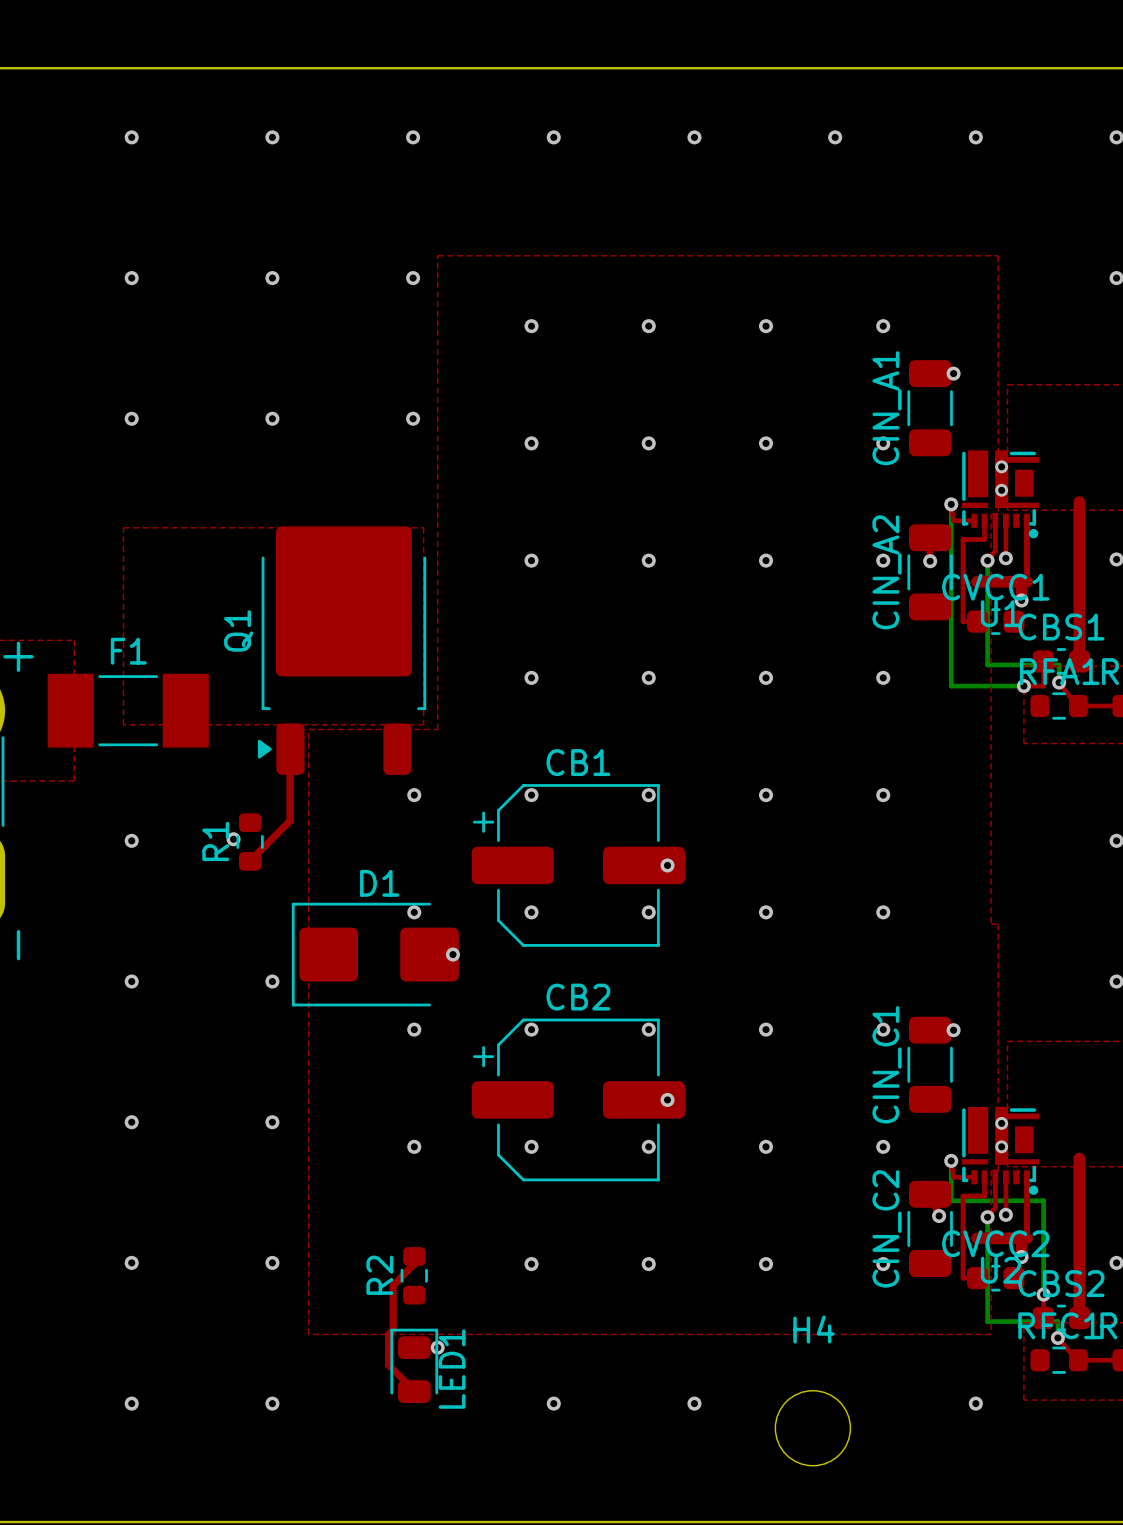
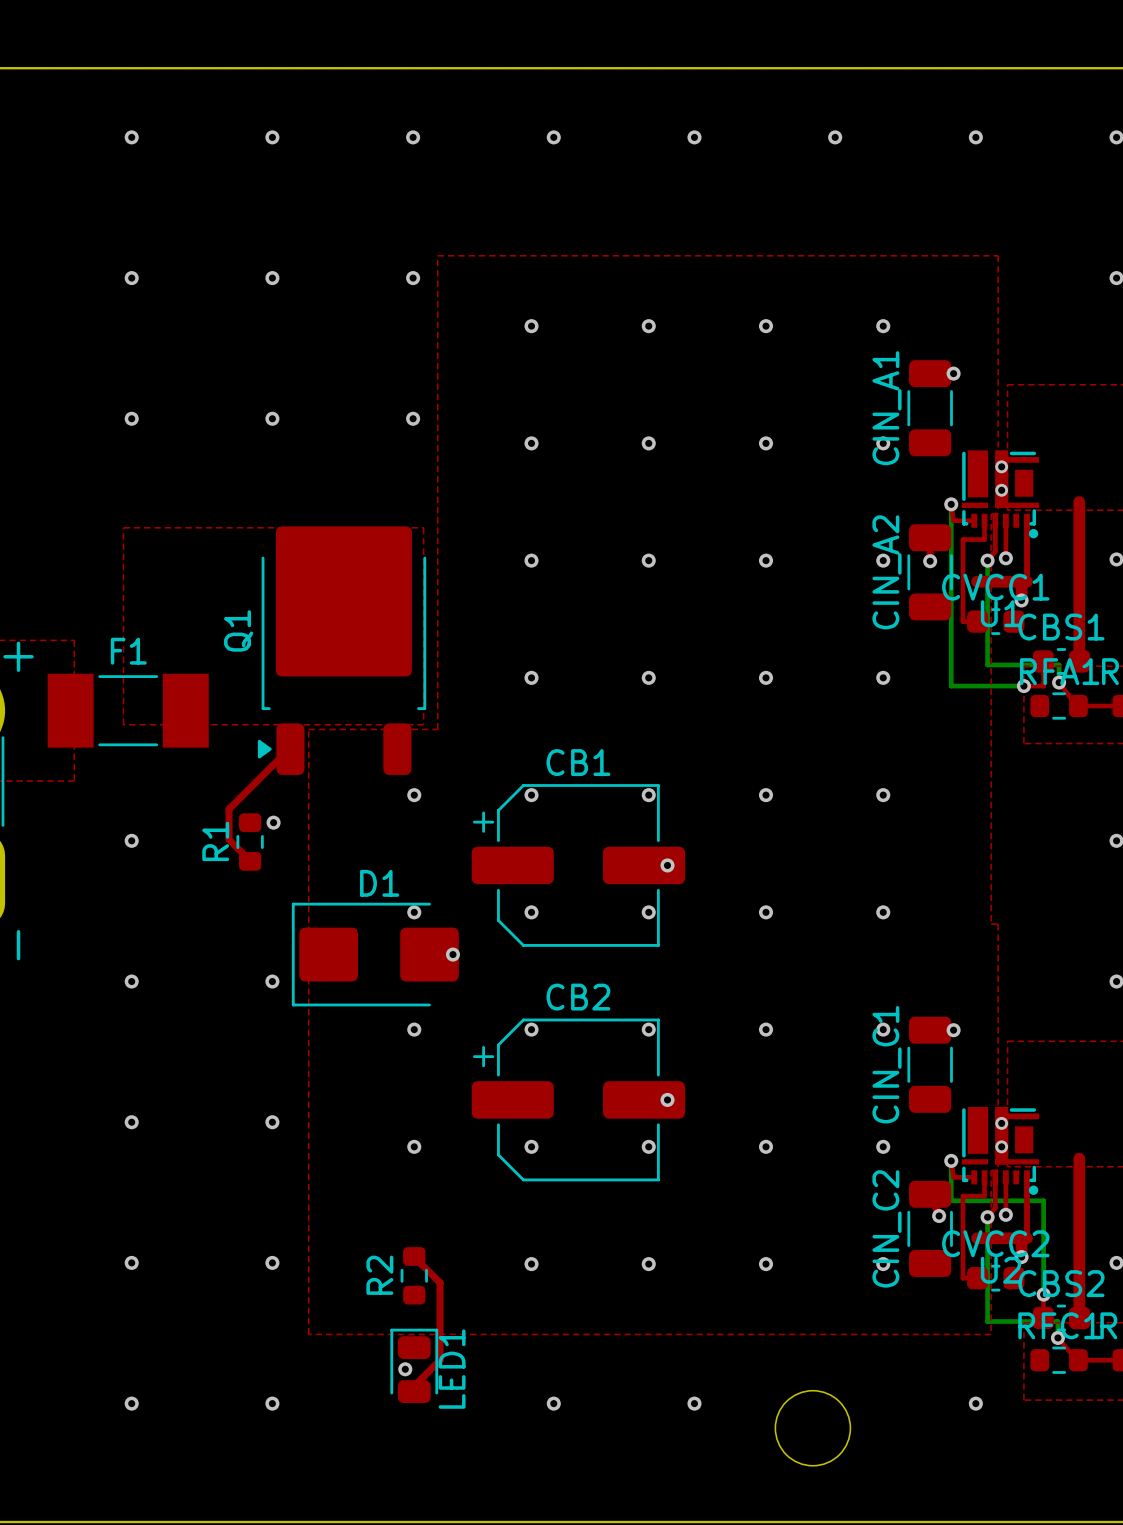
top track: (289, 748) (289, 820) (250, 860) -> (289, 748) (229, 809) (229, 839) (250, 860)
via position: (233, 839) -> (273, 822)
top track: (414, 1257) (414, 1264) (393, 1285) (393, 1329) (388, 1334) (388, 1364) (414, 1390) -> (414, 1257) (440, 1282) (440, 1360) (414, 1386) (414, 1390)
H4 name: H4 (814, 1329) -> none
via position: (437, 1347) -> (405, 1369)

